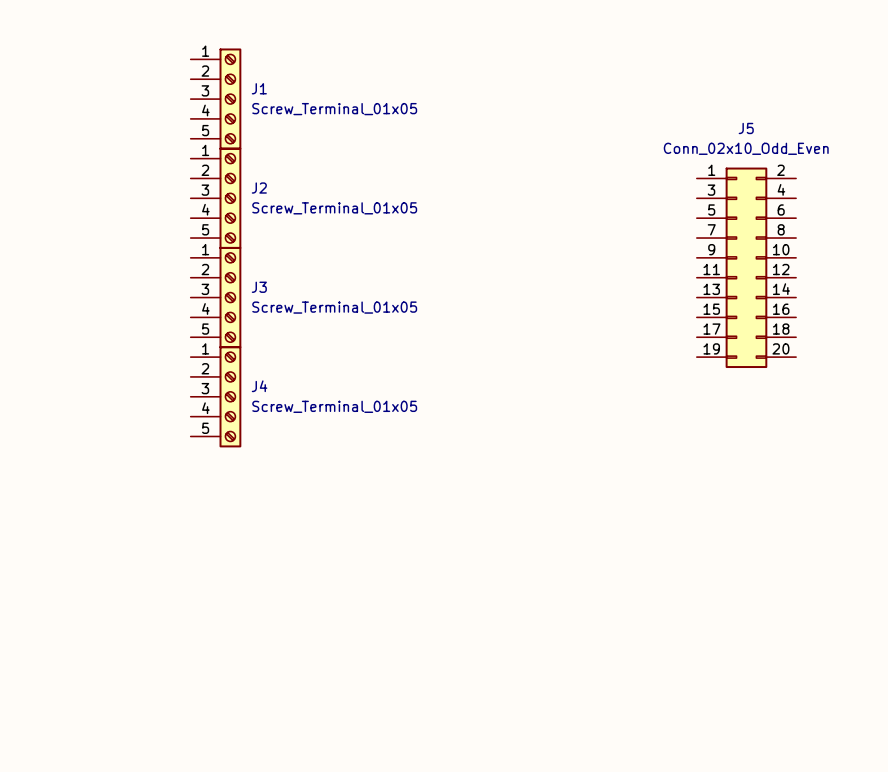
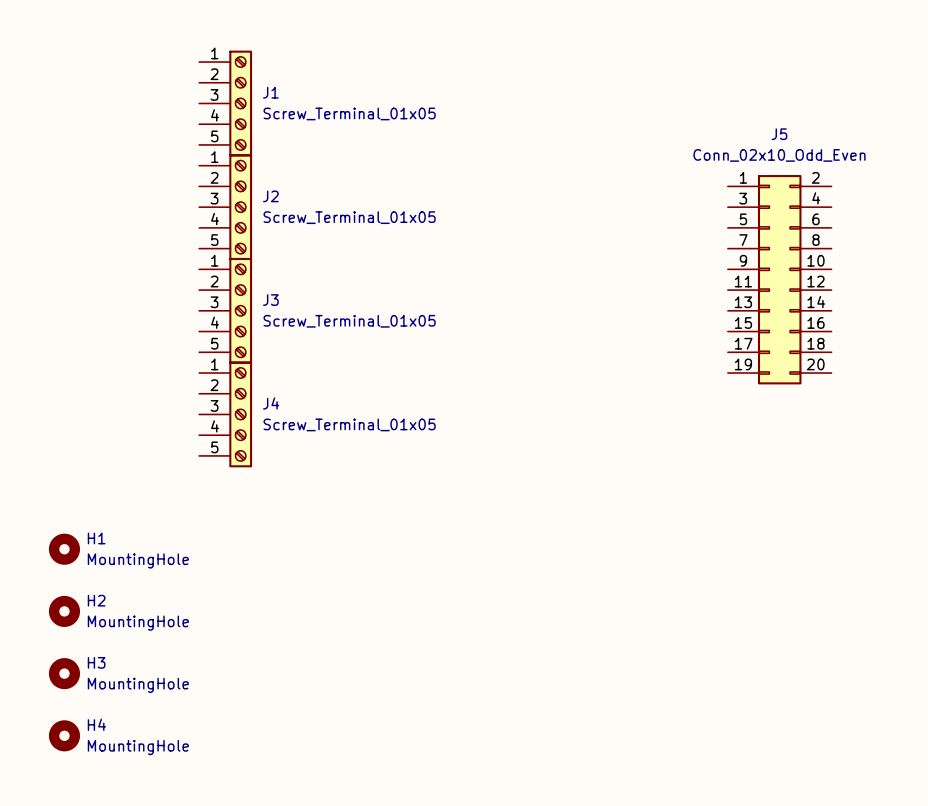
H1: none -> MountingHole (64, 549)
H2: none -> MountingHole (64, 611)
H3: none -> MountingHole (64, 673)
H4: none -> MountingHole (64, 735)

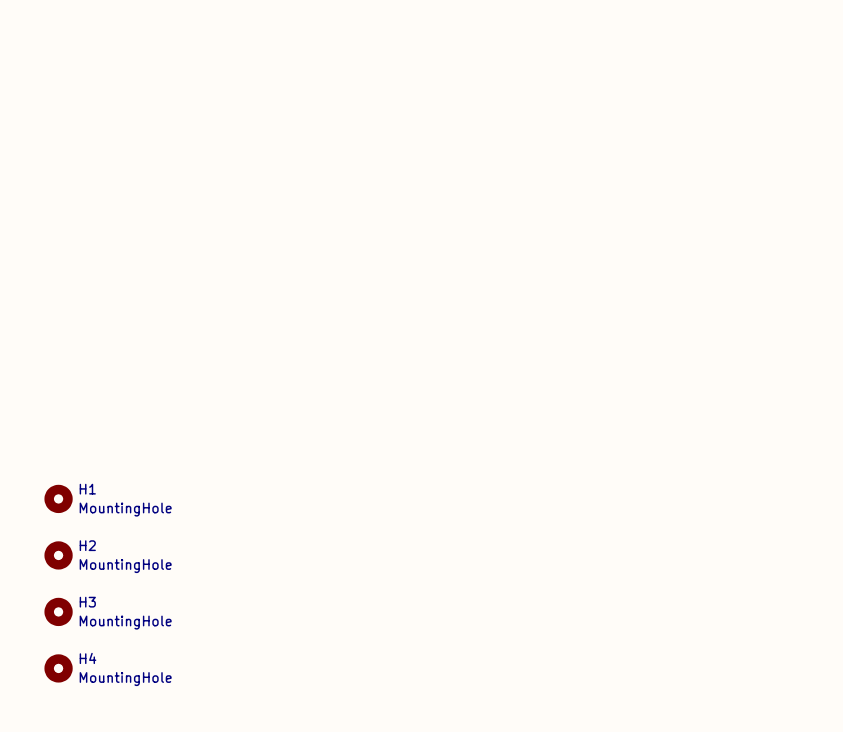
J1: Screw_Terminal_01x05 (225, 103) -> none
J2: Screw_Terminal_01x05 (225, 207) -> none
J5: Conn_02x10_Odd_Even (779, 279) -> none
J3: Screw_Terminal_01x05 (225, 310) -> none
J4: Screw_Terminal_01x05 (225, 414) -> none

